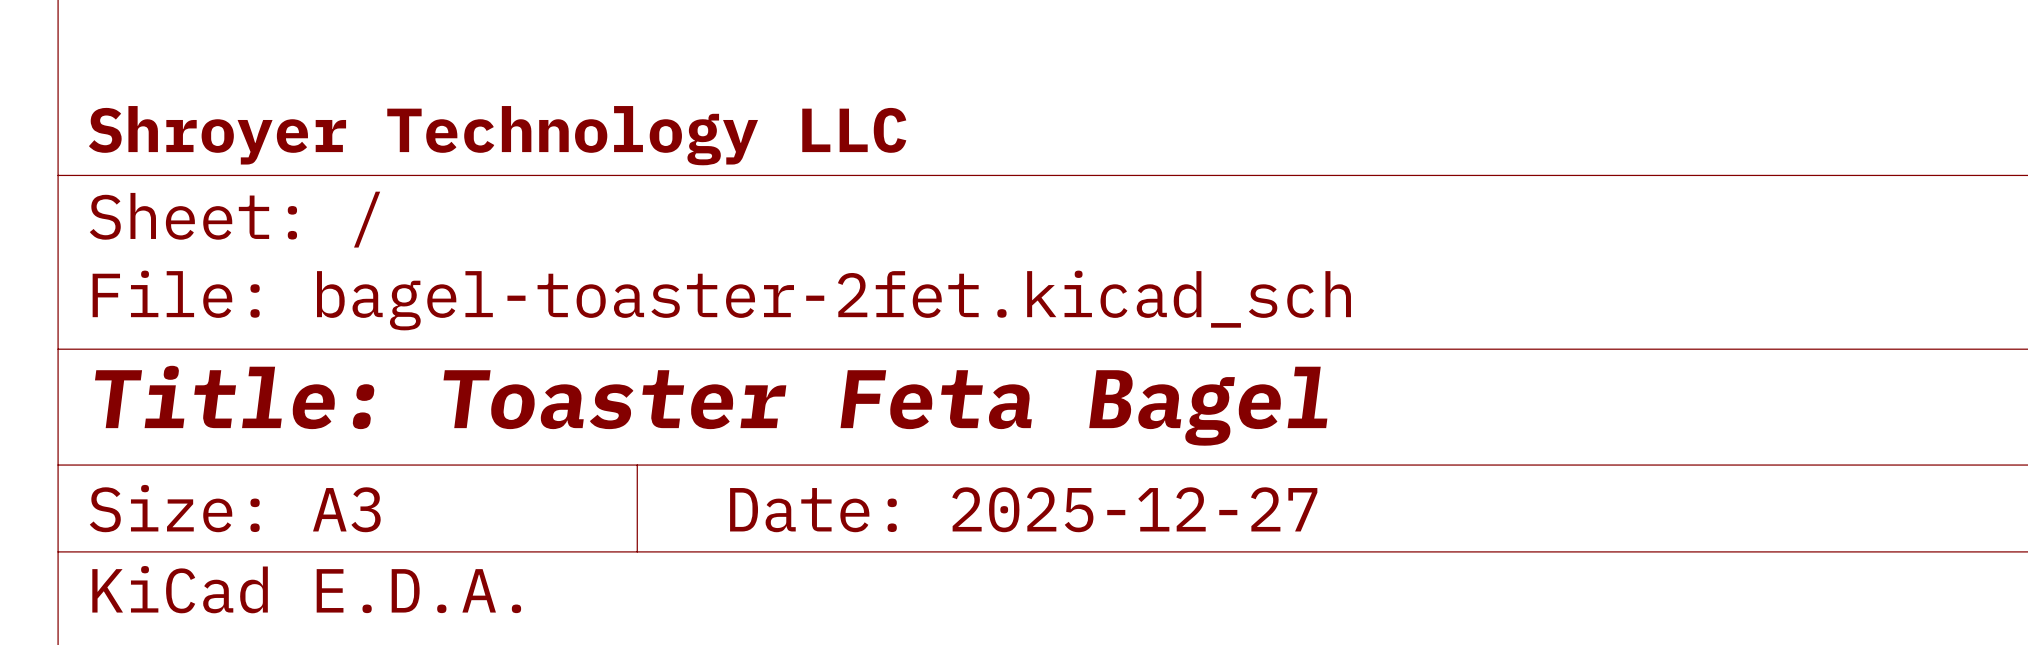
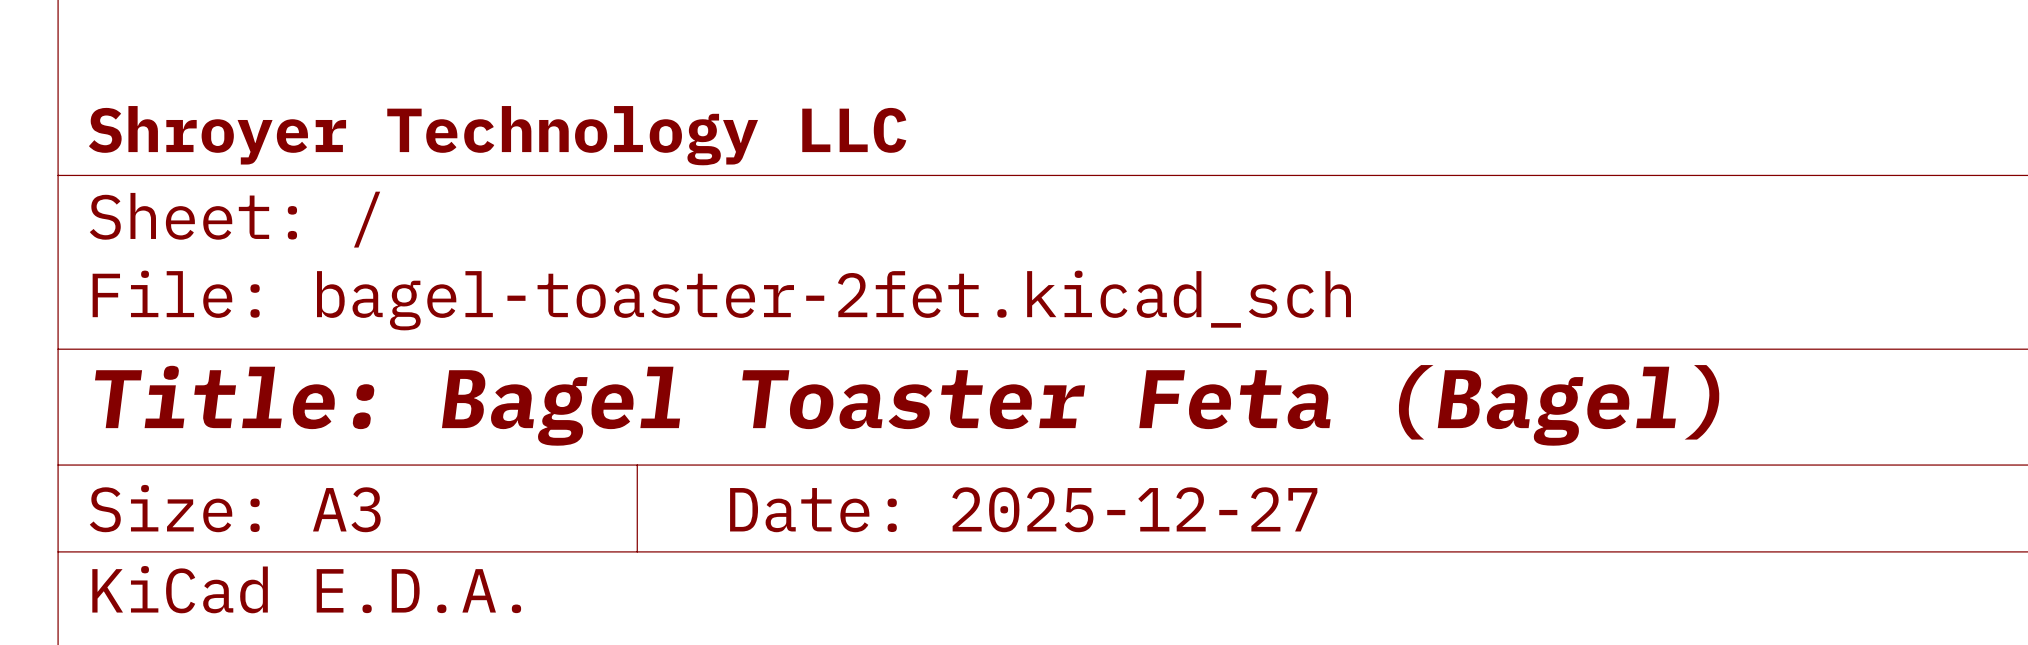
title block: Title: Toaster Feta Bagel (711, 405) -> Title: Bagel Toaster Feta (Bagel) (907, 405)

